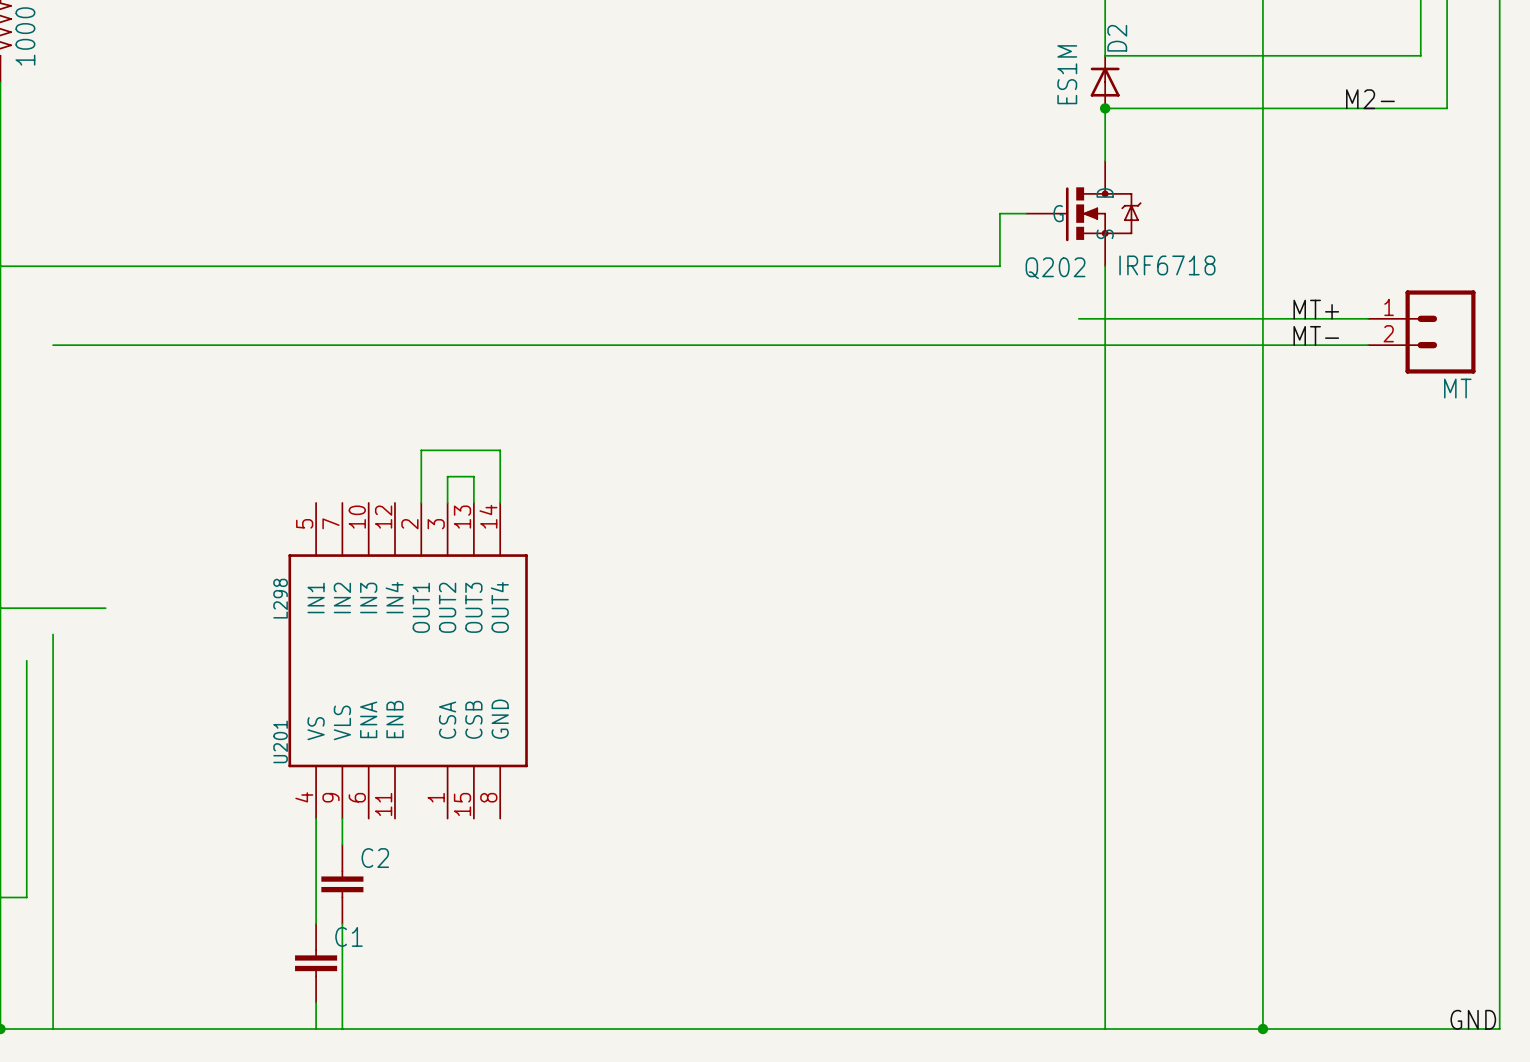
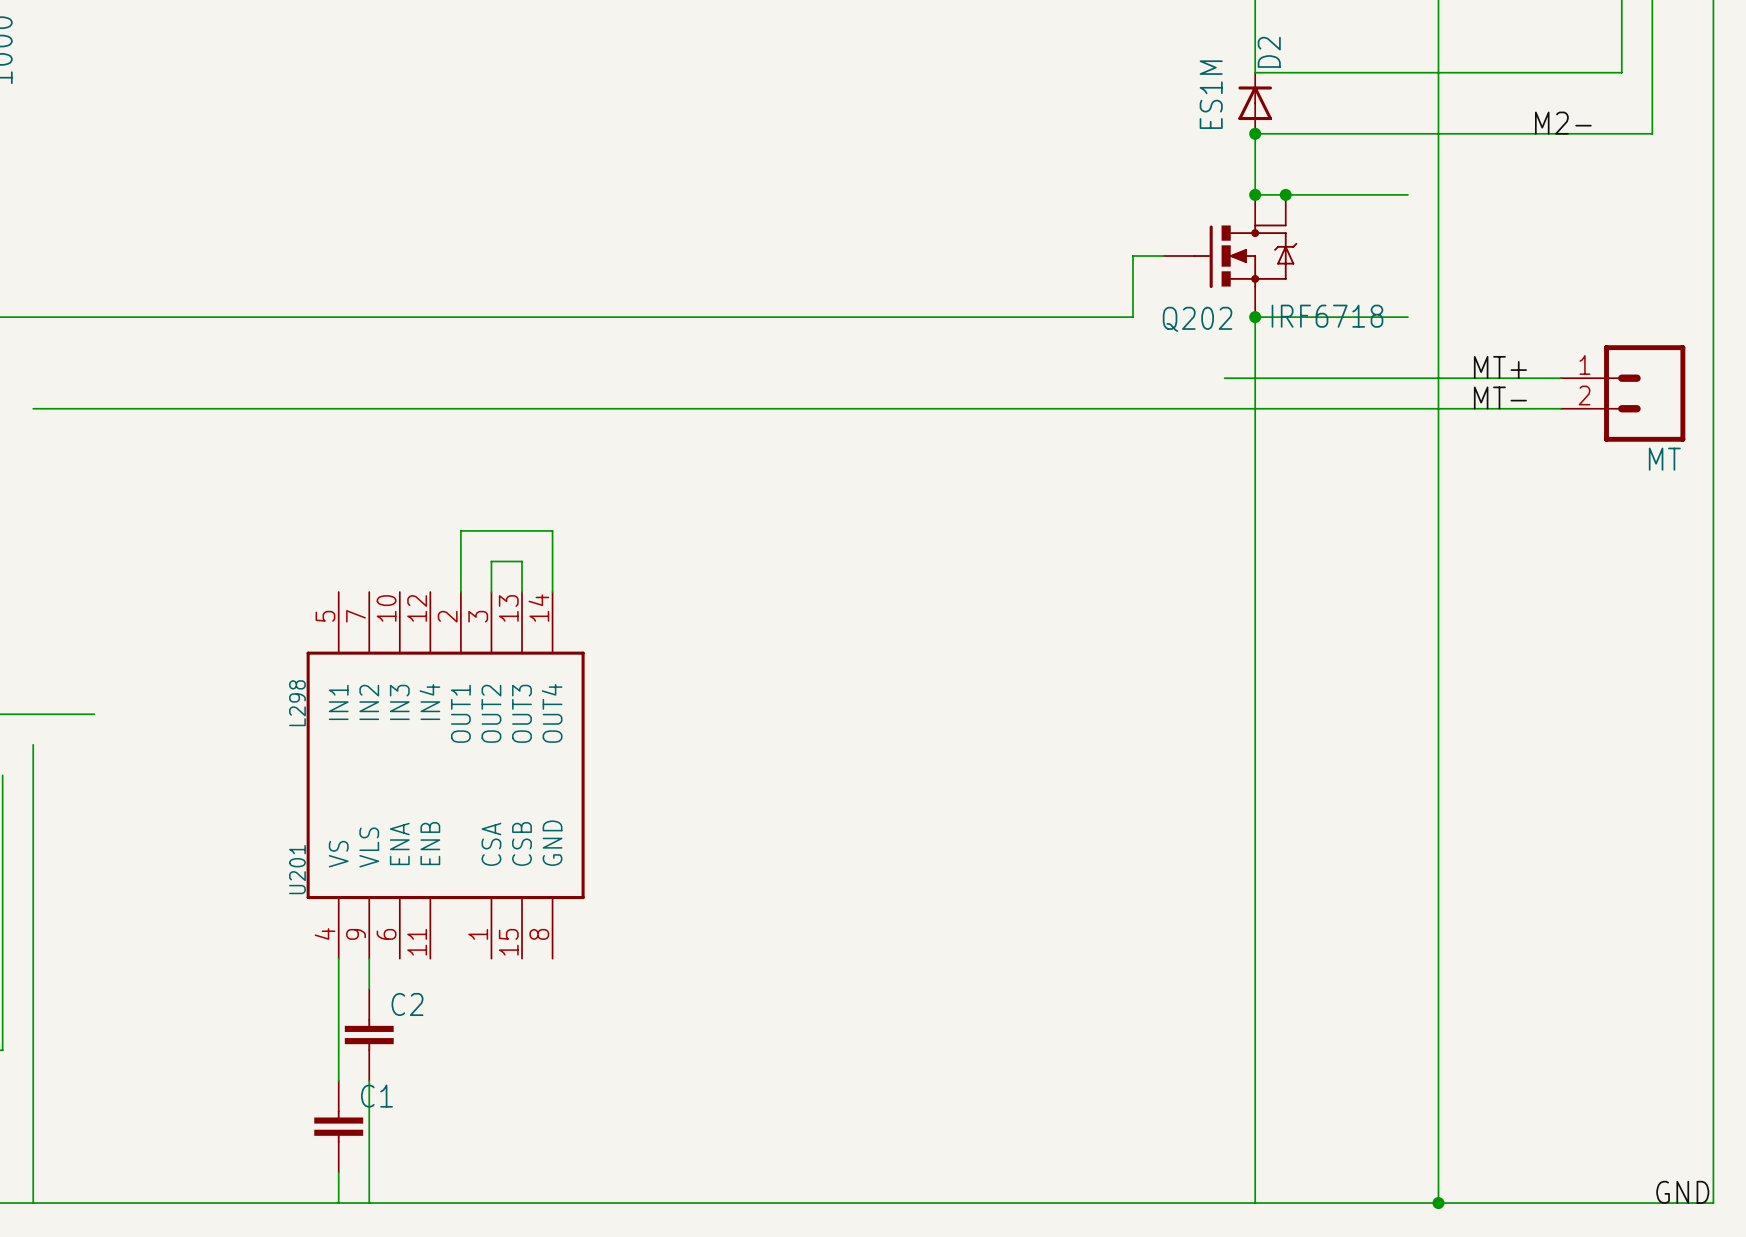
Q202 symbol: [1025, 160, 1142, 268] -> [1163, 194, 1298, 318]
wire: none -> (1255, 194) (1407, 194)
junction: none -> (1255, 194)
junction: none -> (1285, 194)
wire: none -> (1255, 317) (1407, 317)
junction: none -> (1255, 317)

